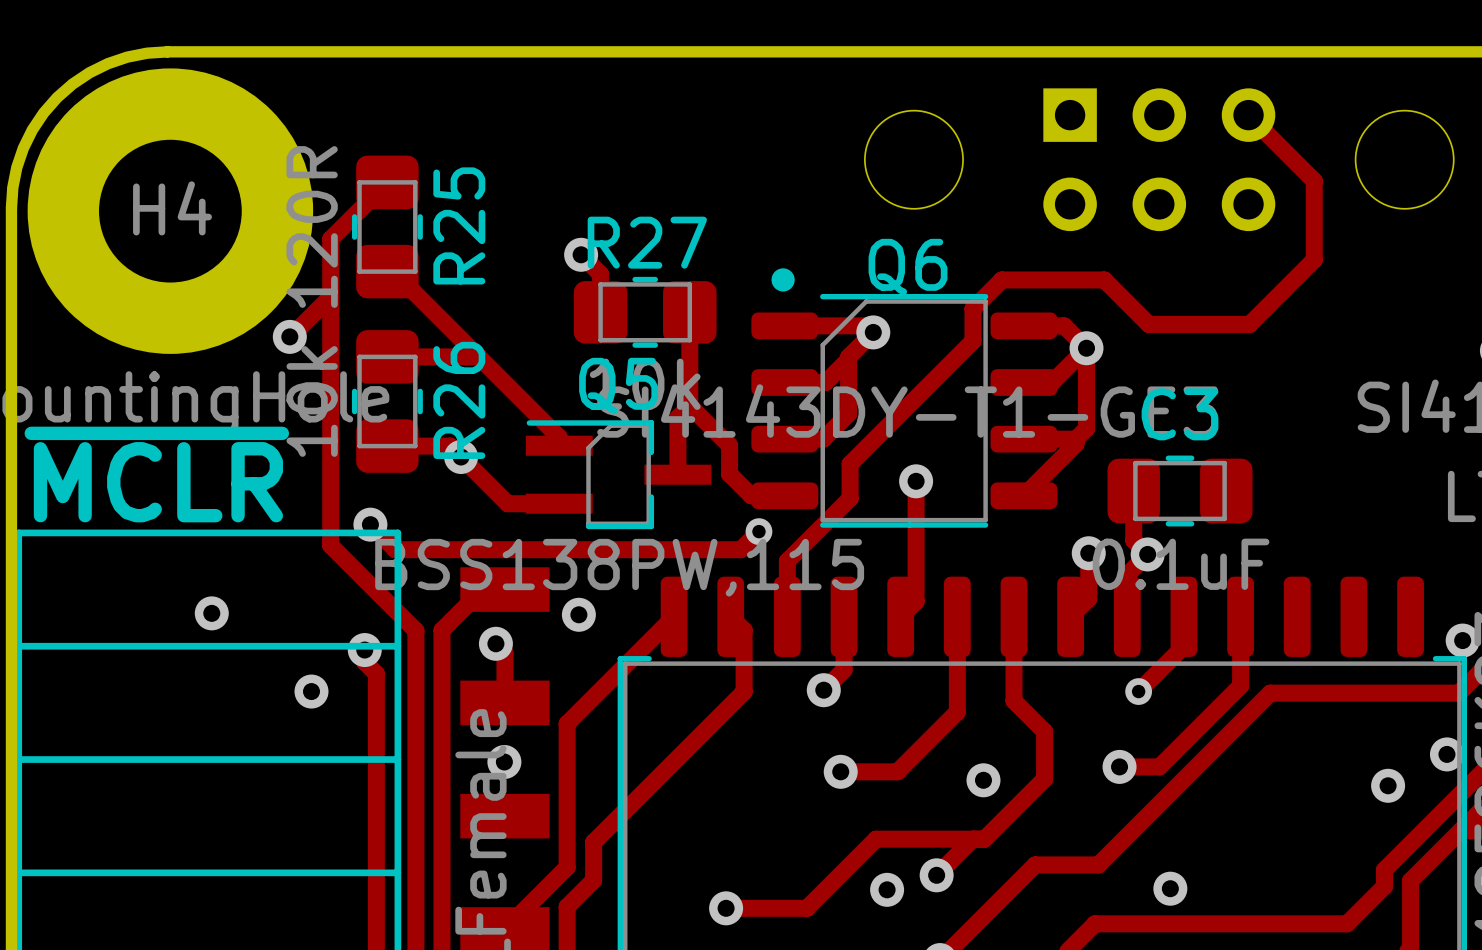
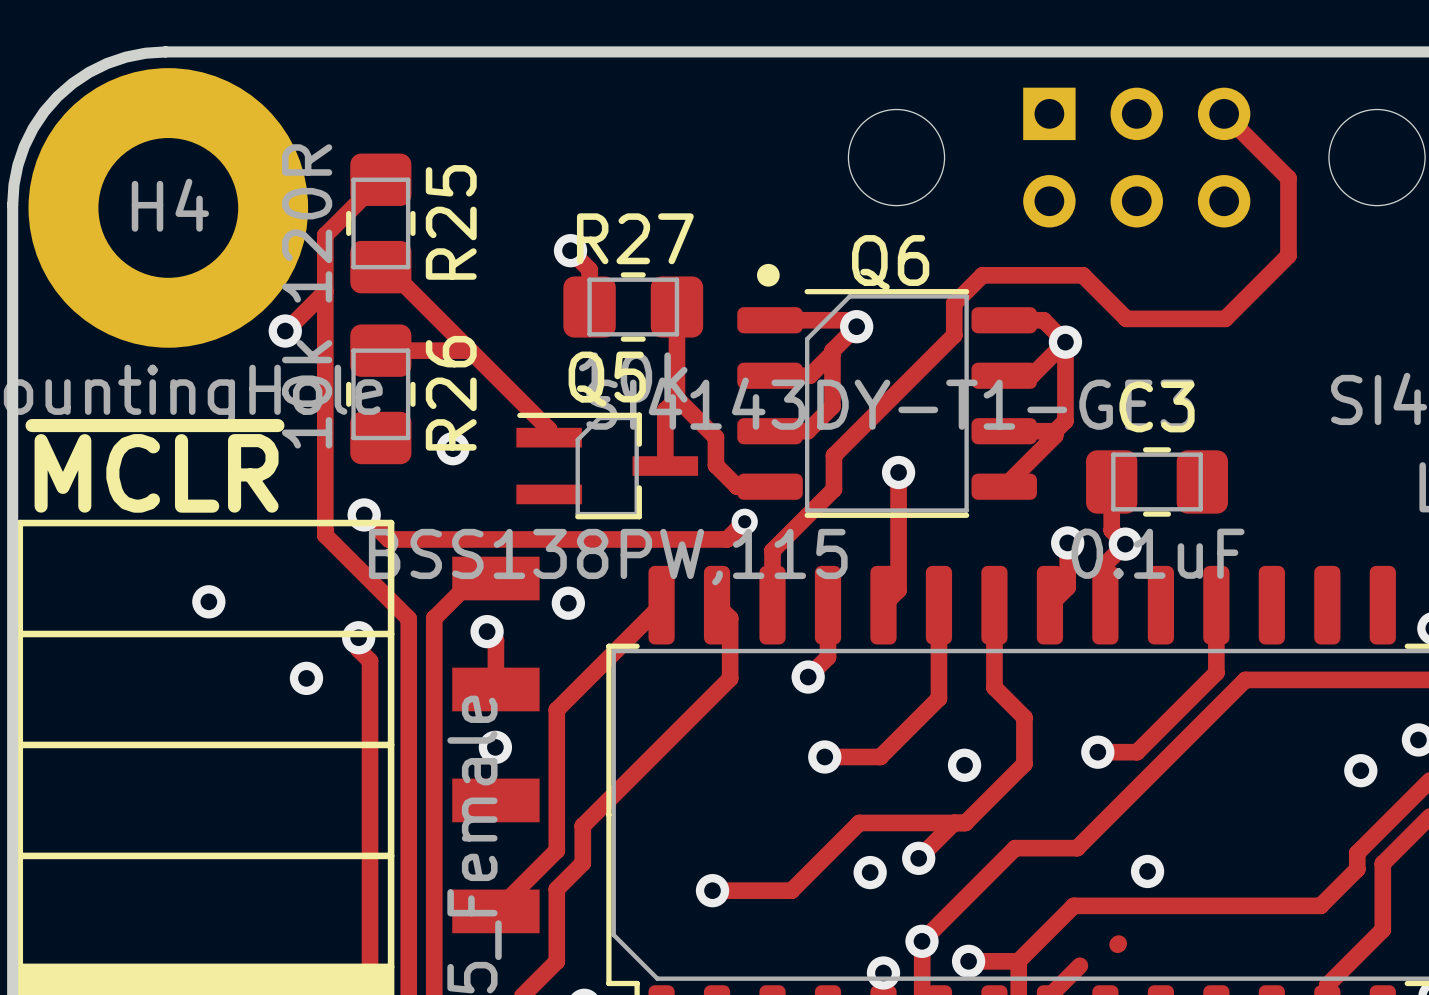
track: (387, 446) (450, 446) (507, 503) (559, 503) -> none
track: (1183, 646) (1138, 691) -> none
via: (1138, 691) -> none

